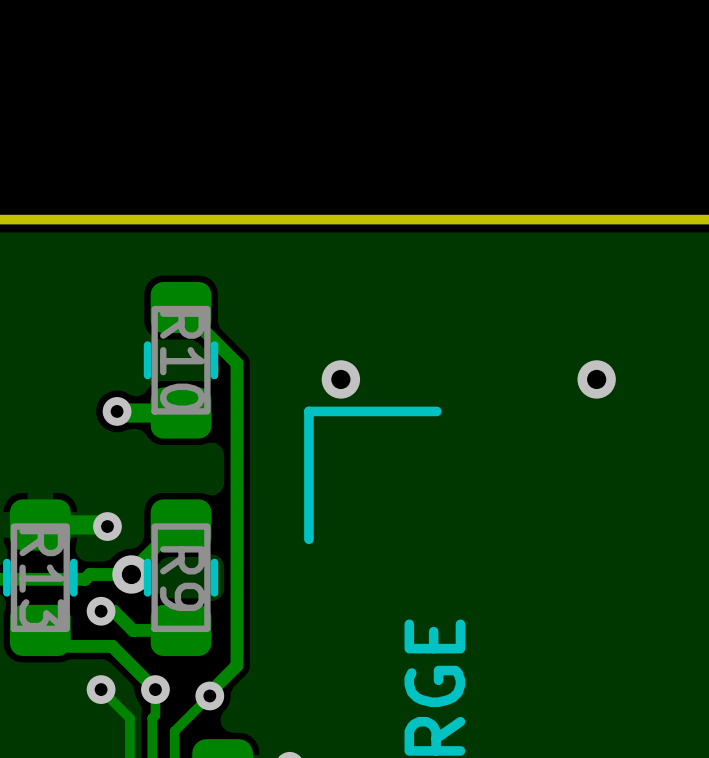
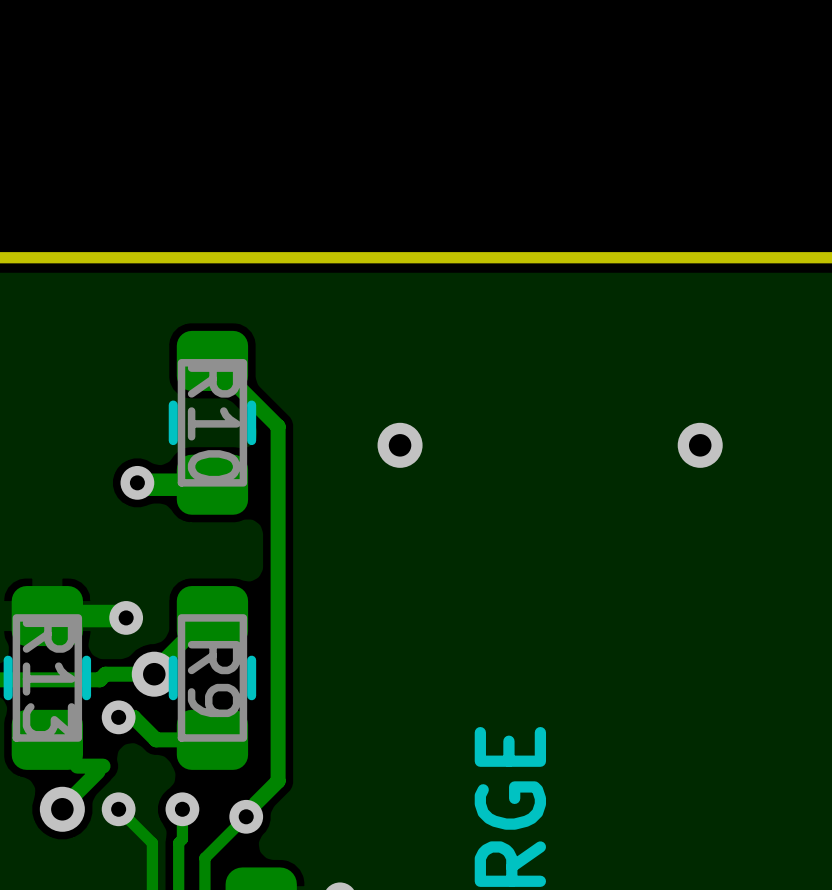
line: (436, 411) (308, 411) (308, 539) -> none
track: (69, 646) (112, 646) (145, 679) -> none
track: none -> (103, 766) (77, 766)
track: none -> (98, 771) (62, 809)
via: none -> (62, 809)

